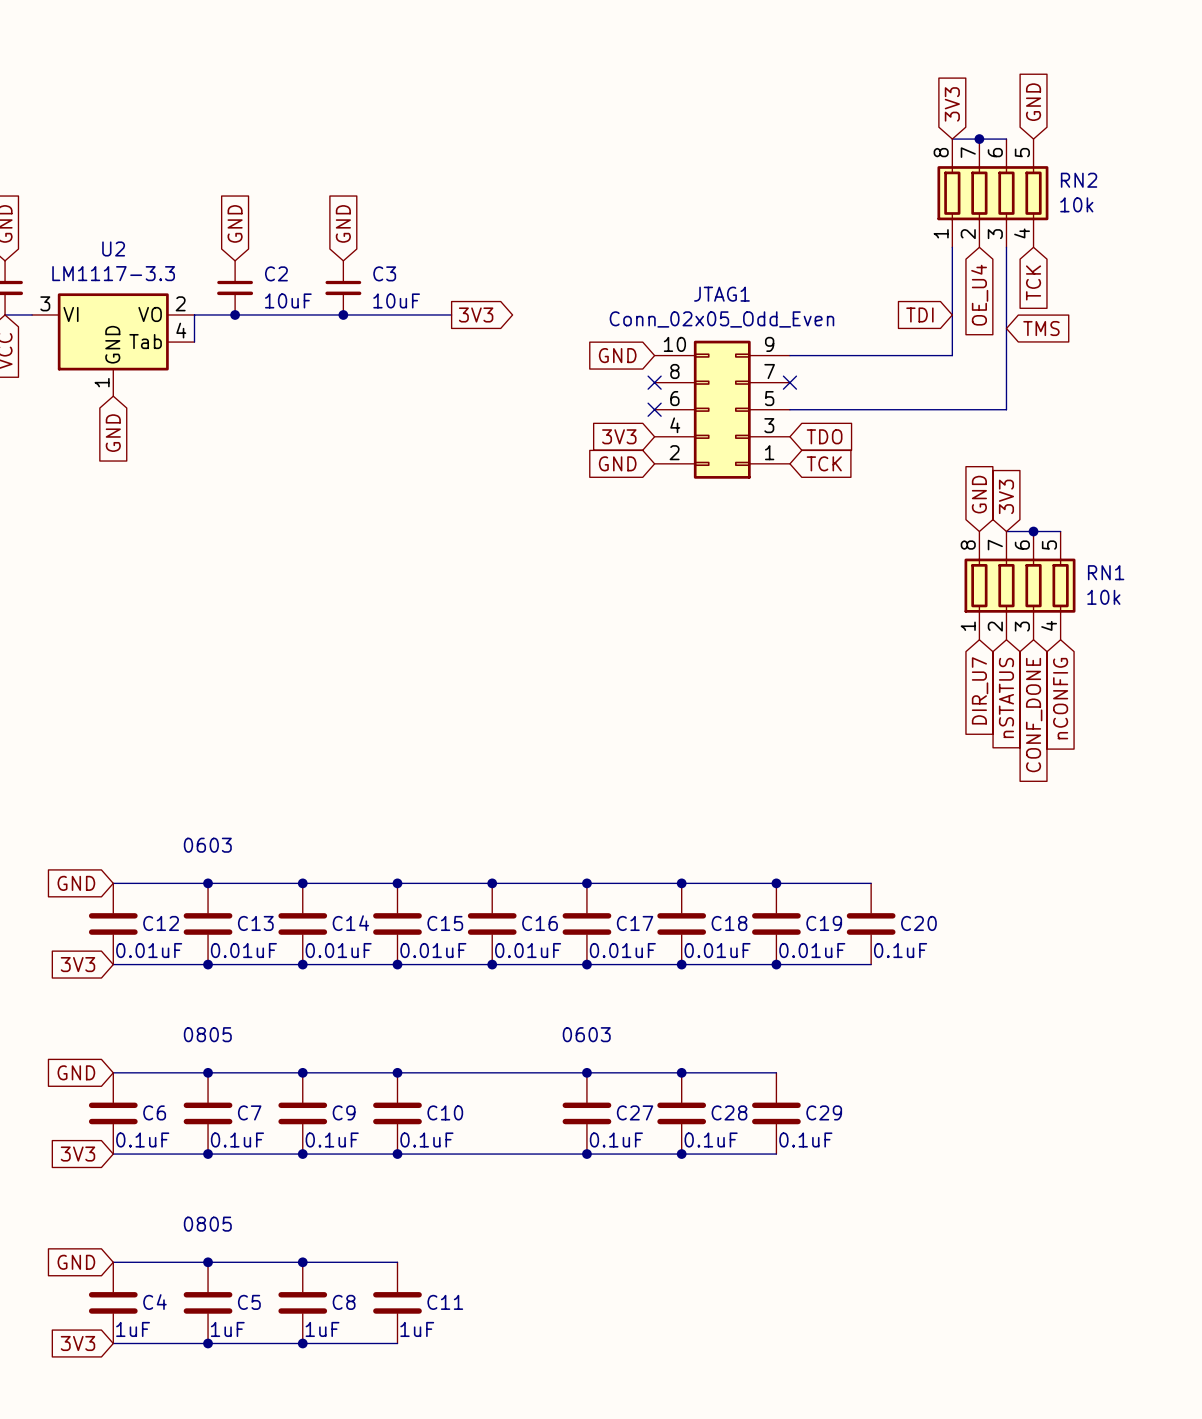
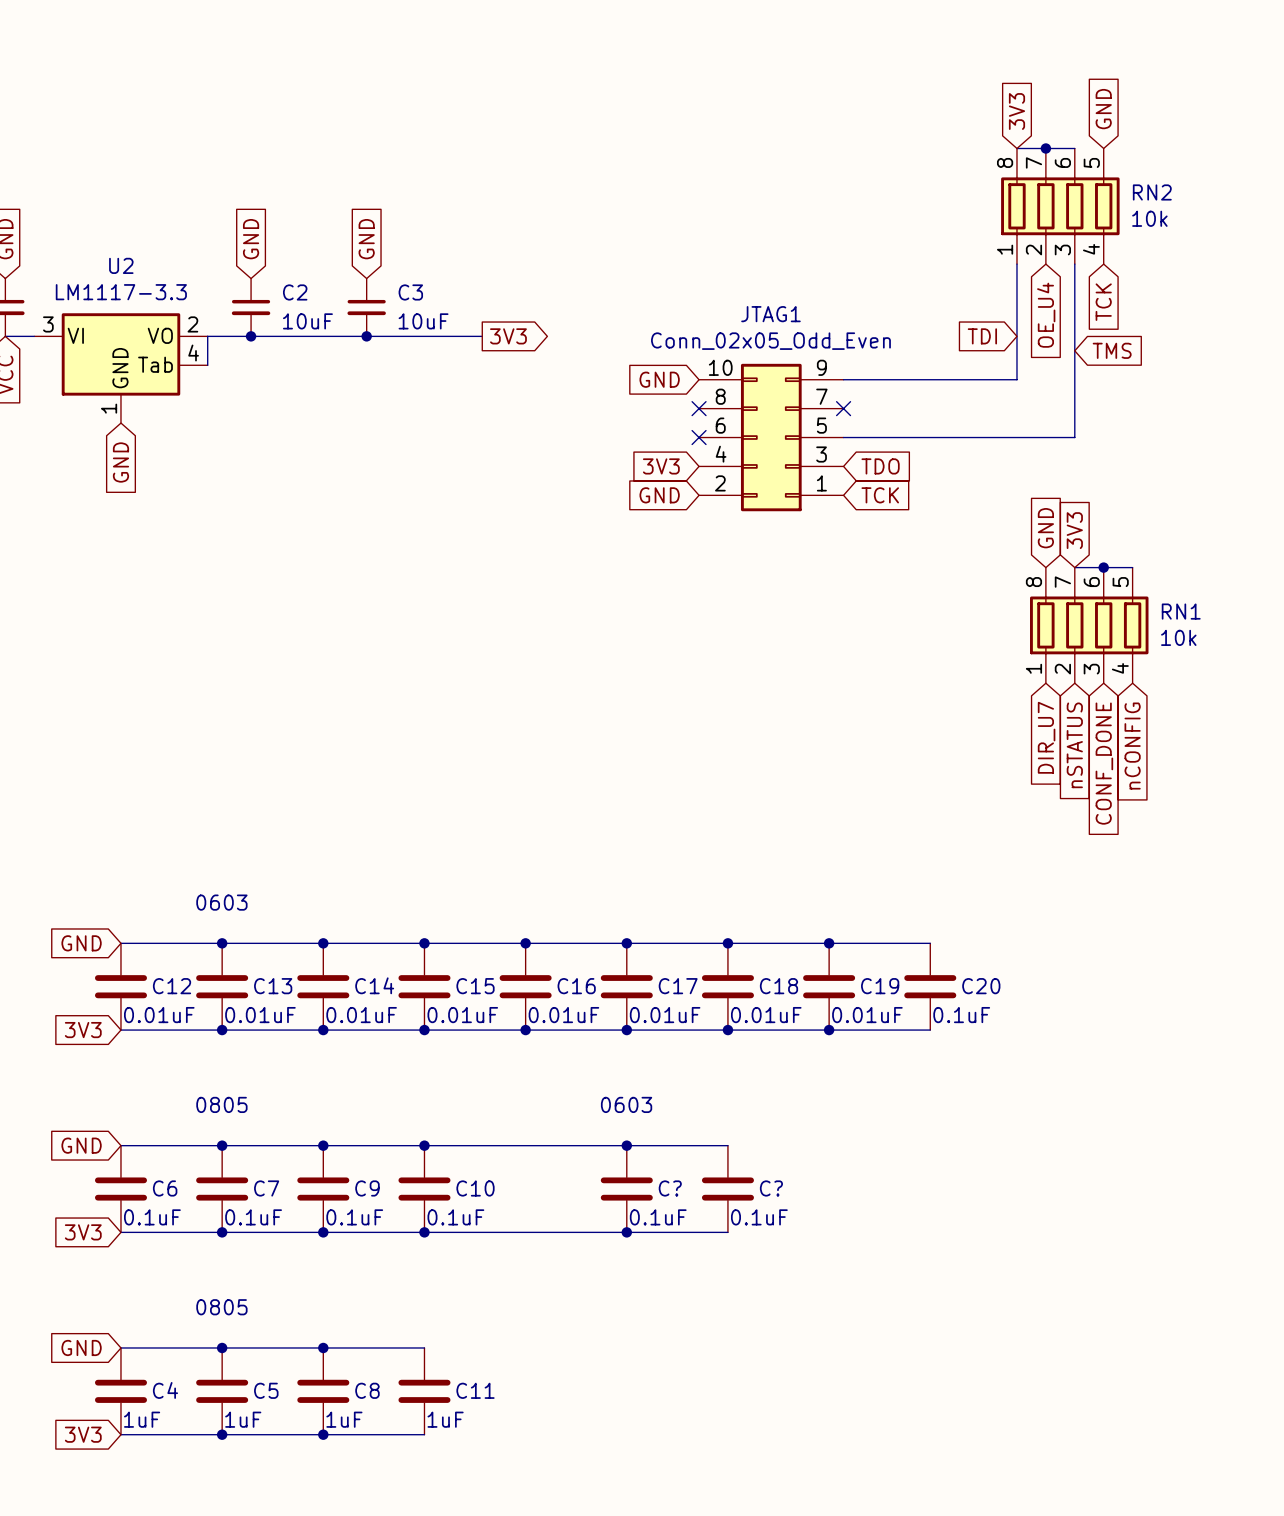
wire: (681, 1072) (776, 1072) -> none
junction: (681, 1072) -> none
C27 name: C27 (635, 1112) -> C? (670, 1188)
C28 name: C28 (729, 1112) -> C? (771, 1188)
C29: 0.1uF (776, 1113) -> none
wire: (681, 1154) (776, 1154) -> none
junction: (681, 1154) -> none

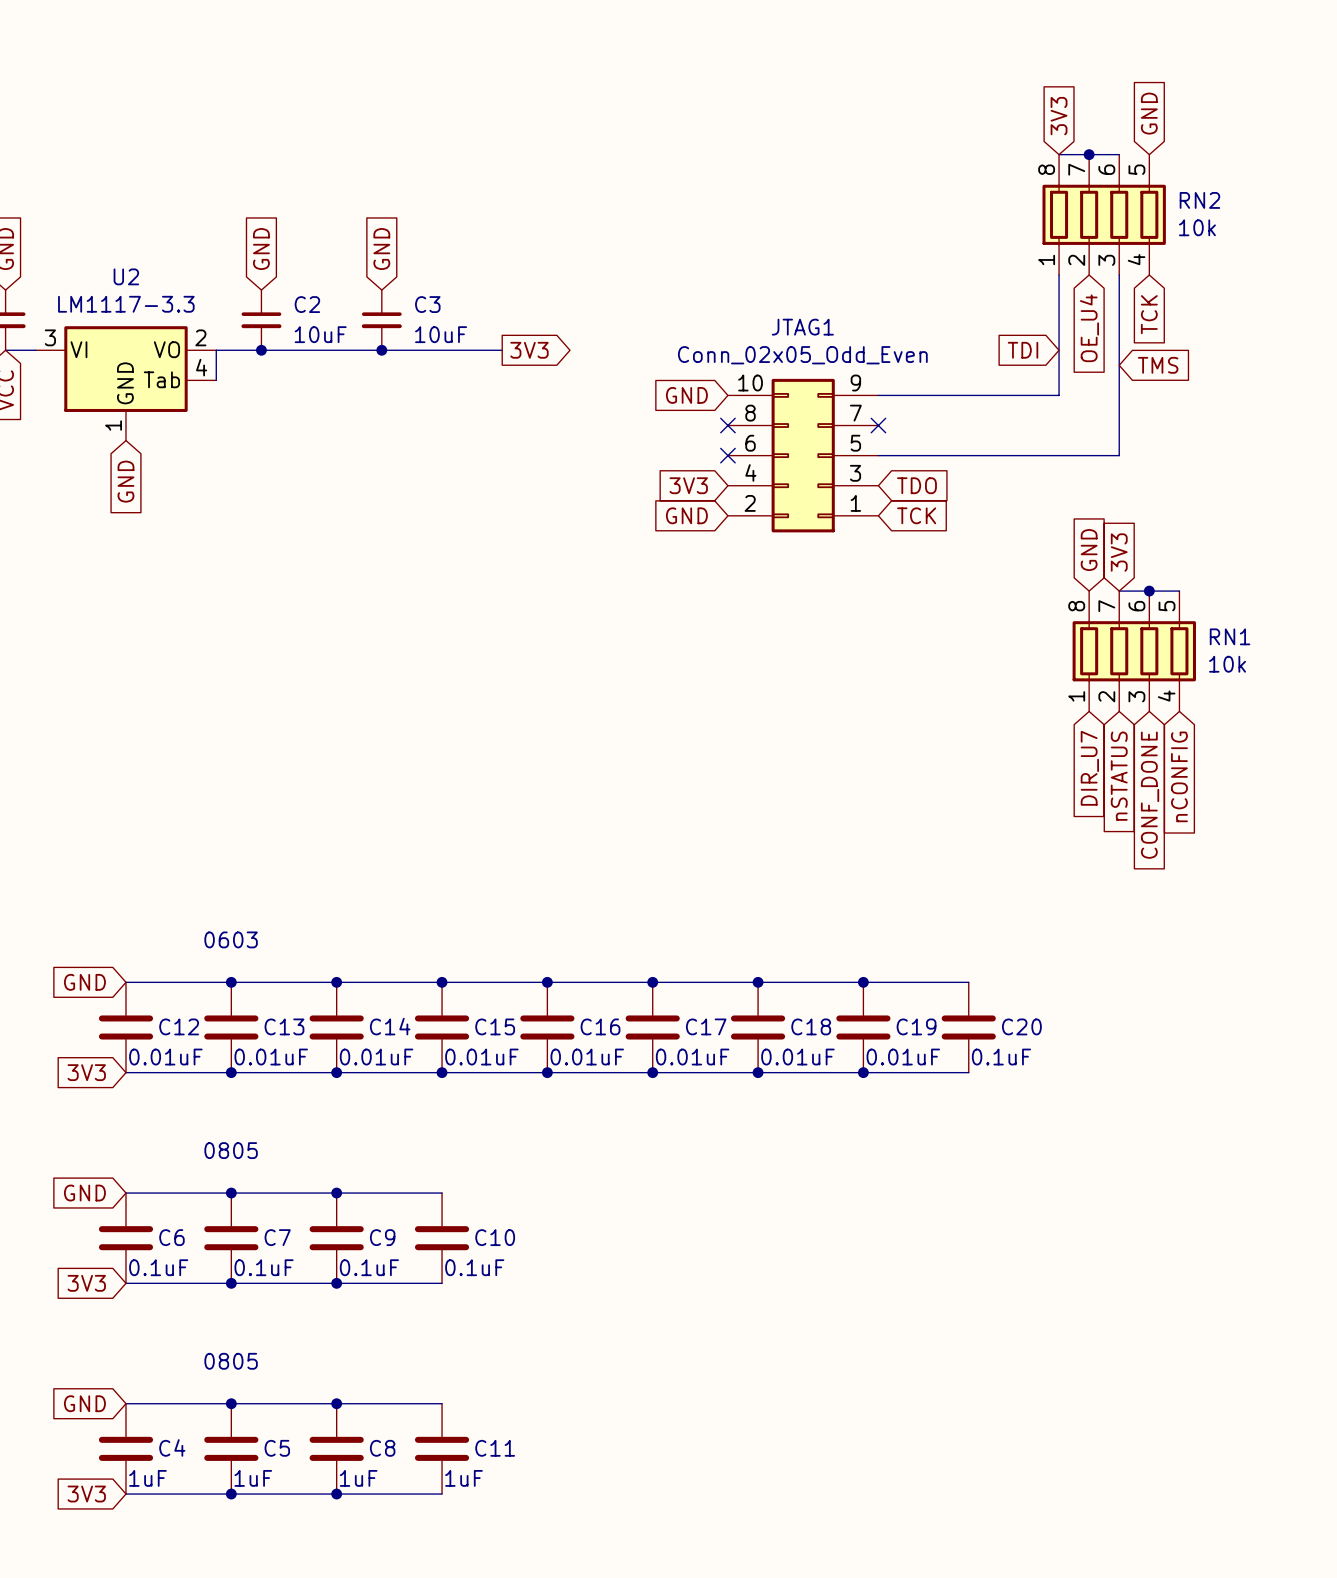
text: 0603 (626, 1104) -> none
wire: (424, 1145) (727, 1145) -> none
junction: (424, 1145) -> none
junction: (626, 1145) -> none
C?: 0.1uF (626, 1189) -> none
C?: 0.1uF (727, 1189) -> none
wire: (424, 1232) (727, 1232) -> none
junction: (424, 1232) -> none
junction: (626, 1232) -> none

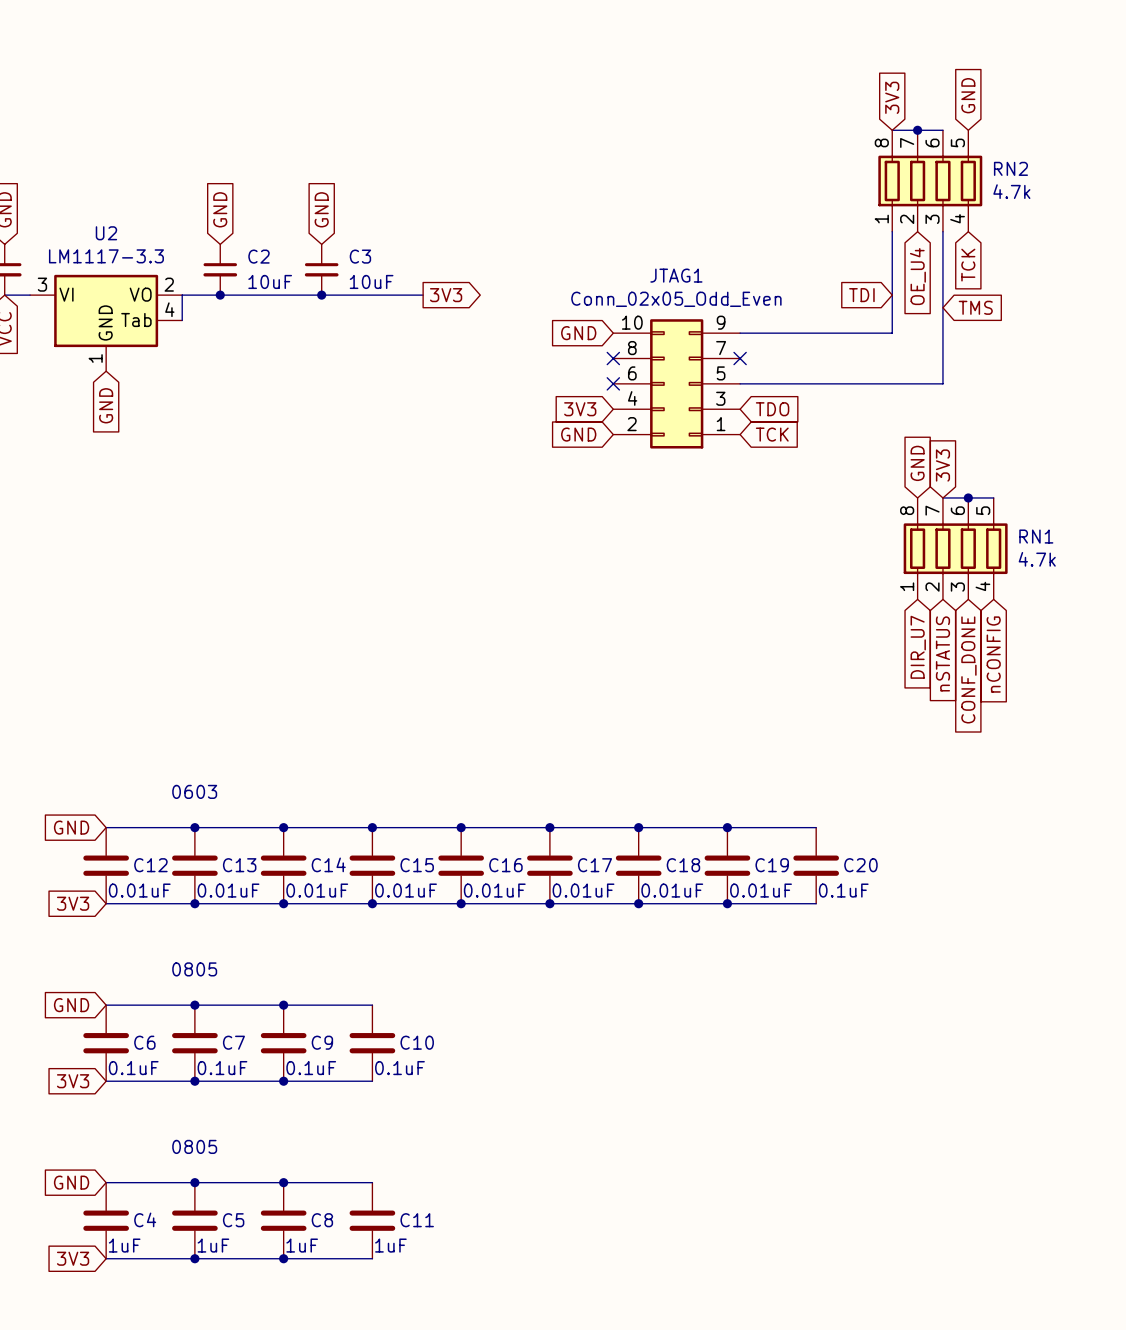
RN2 value: 10k (1197, 227) -> 4.7k (1011, 191)
RN1 value: 10k (1227, 664) -> 4.7k (1037, 559)

